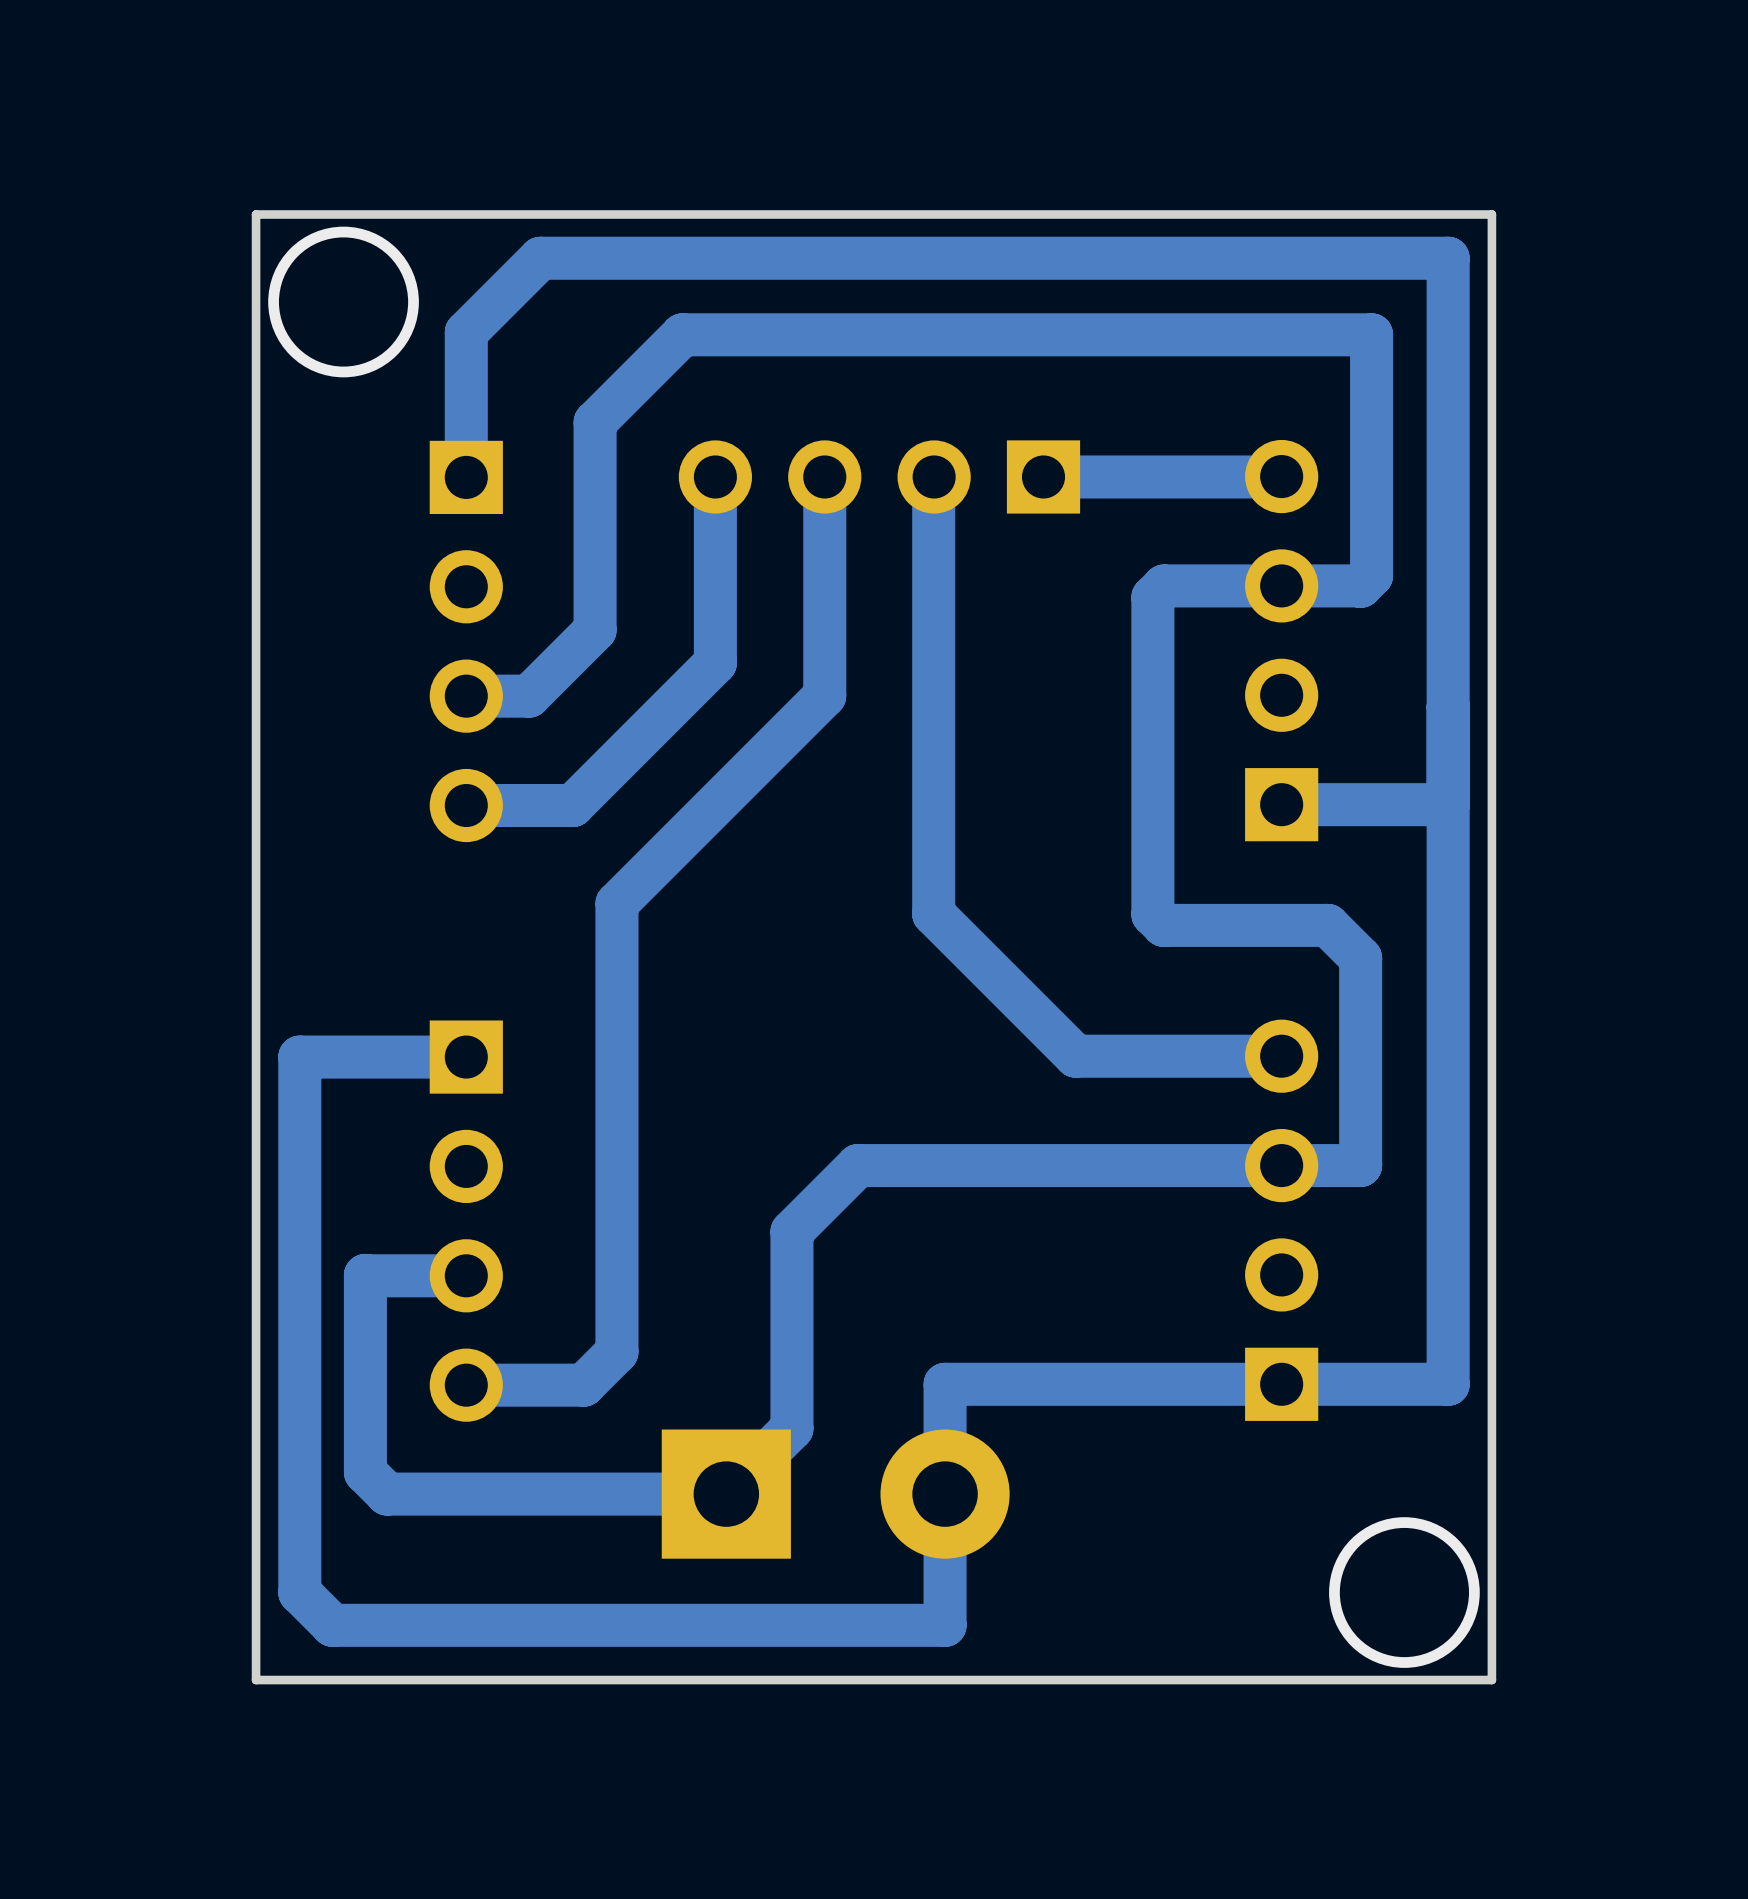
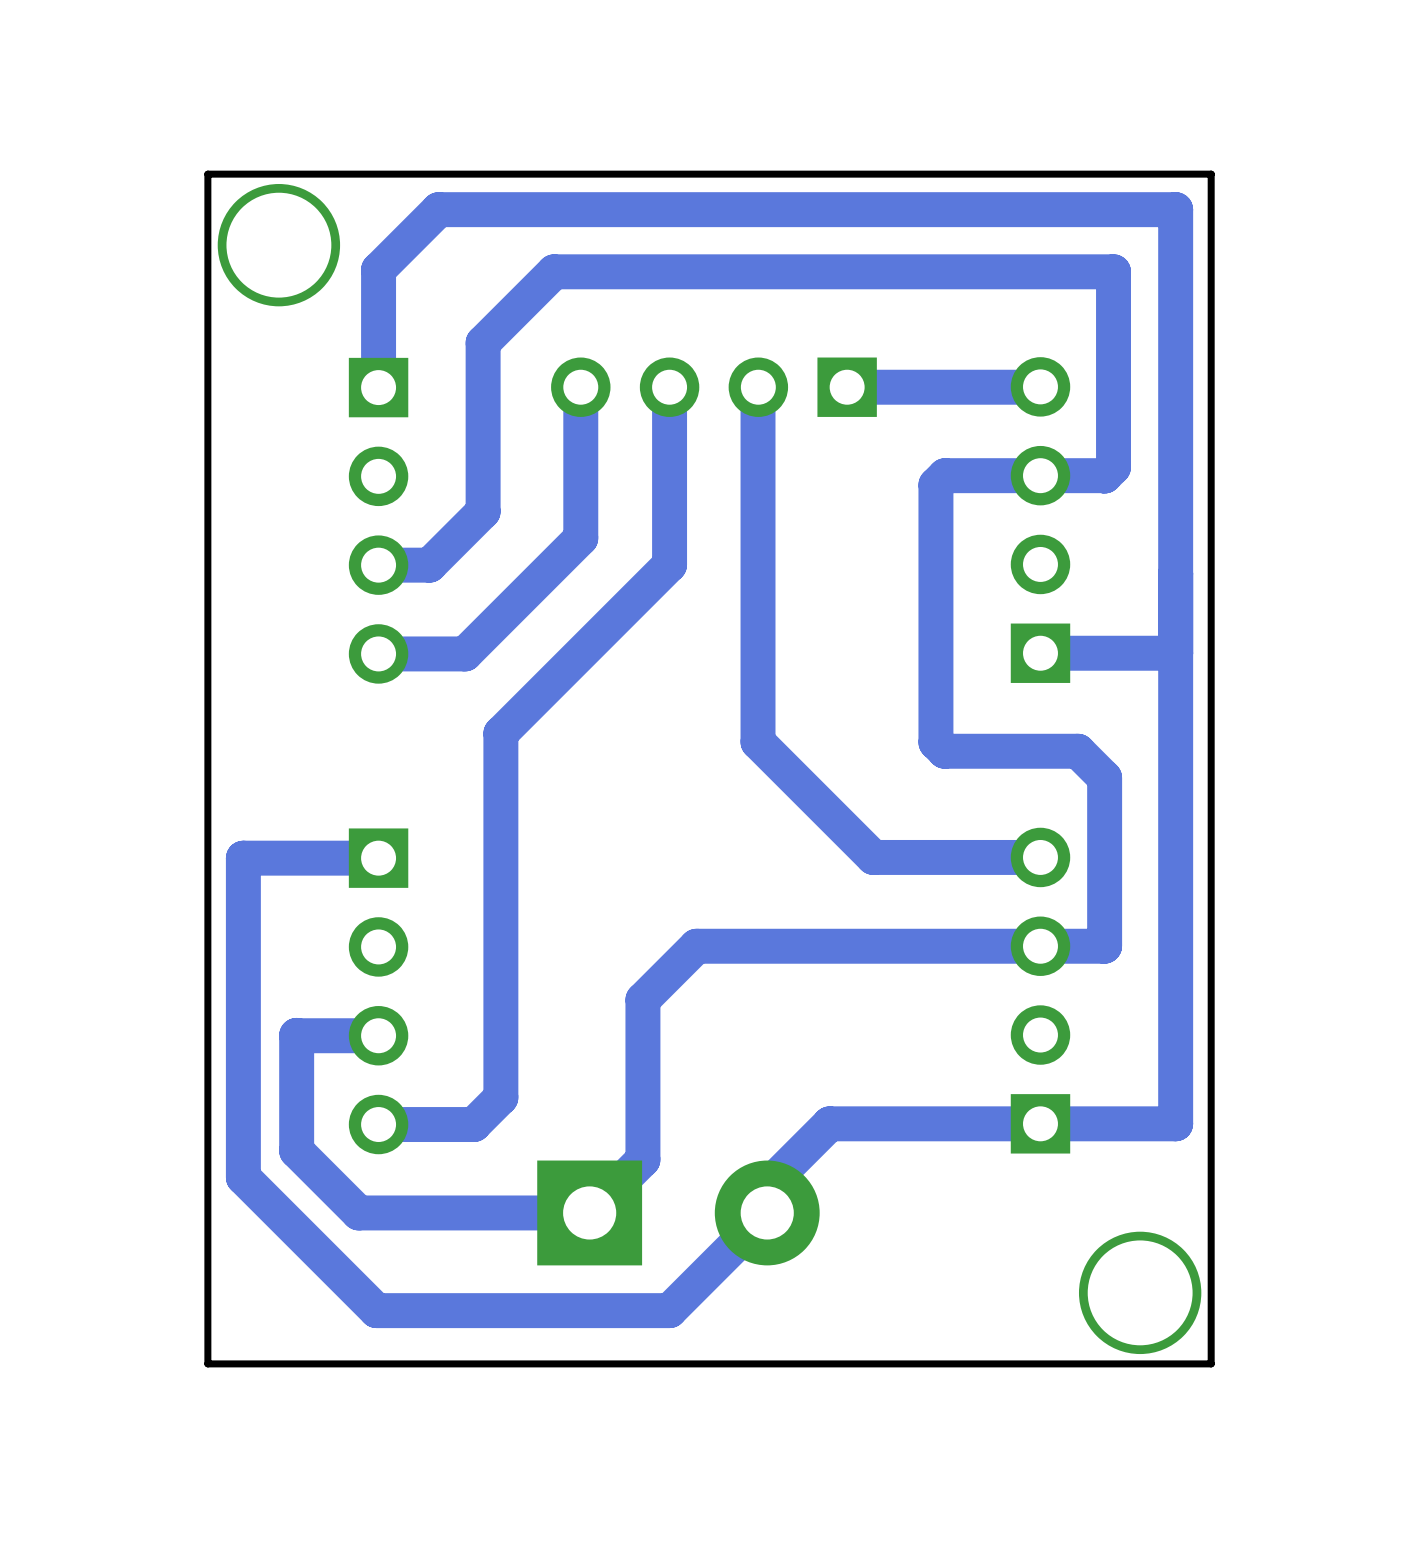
track: (1022, 1384) (945, 1384) (945, 1461) -> (829, 1123) (767, 1186)
track: (365, 1417) (365, 1472) (387, 1494) (441, 1494) -> (296, 1150) (358, 1212)
track: (299, 1450) (299, 1592) (332, 1625) (945, 1625) (945, 1494) -> (243, 1177) (376, 1310) (669, 1310) (767, 1212)

